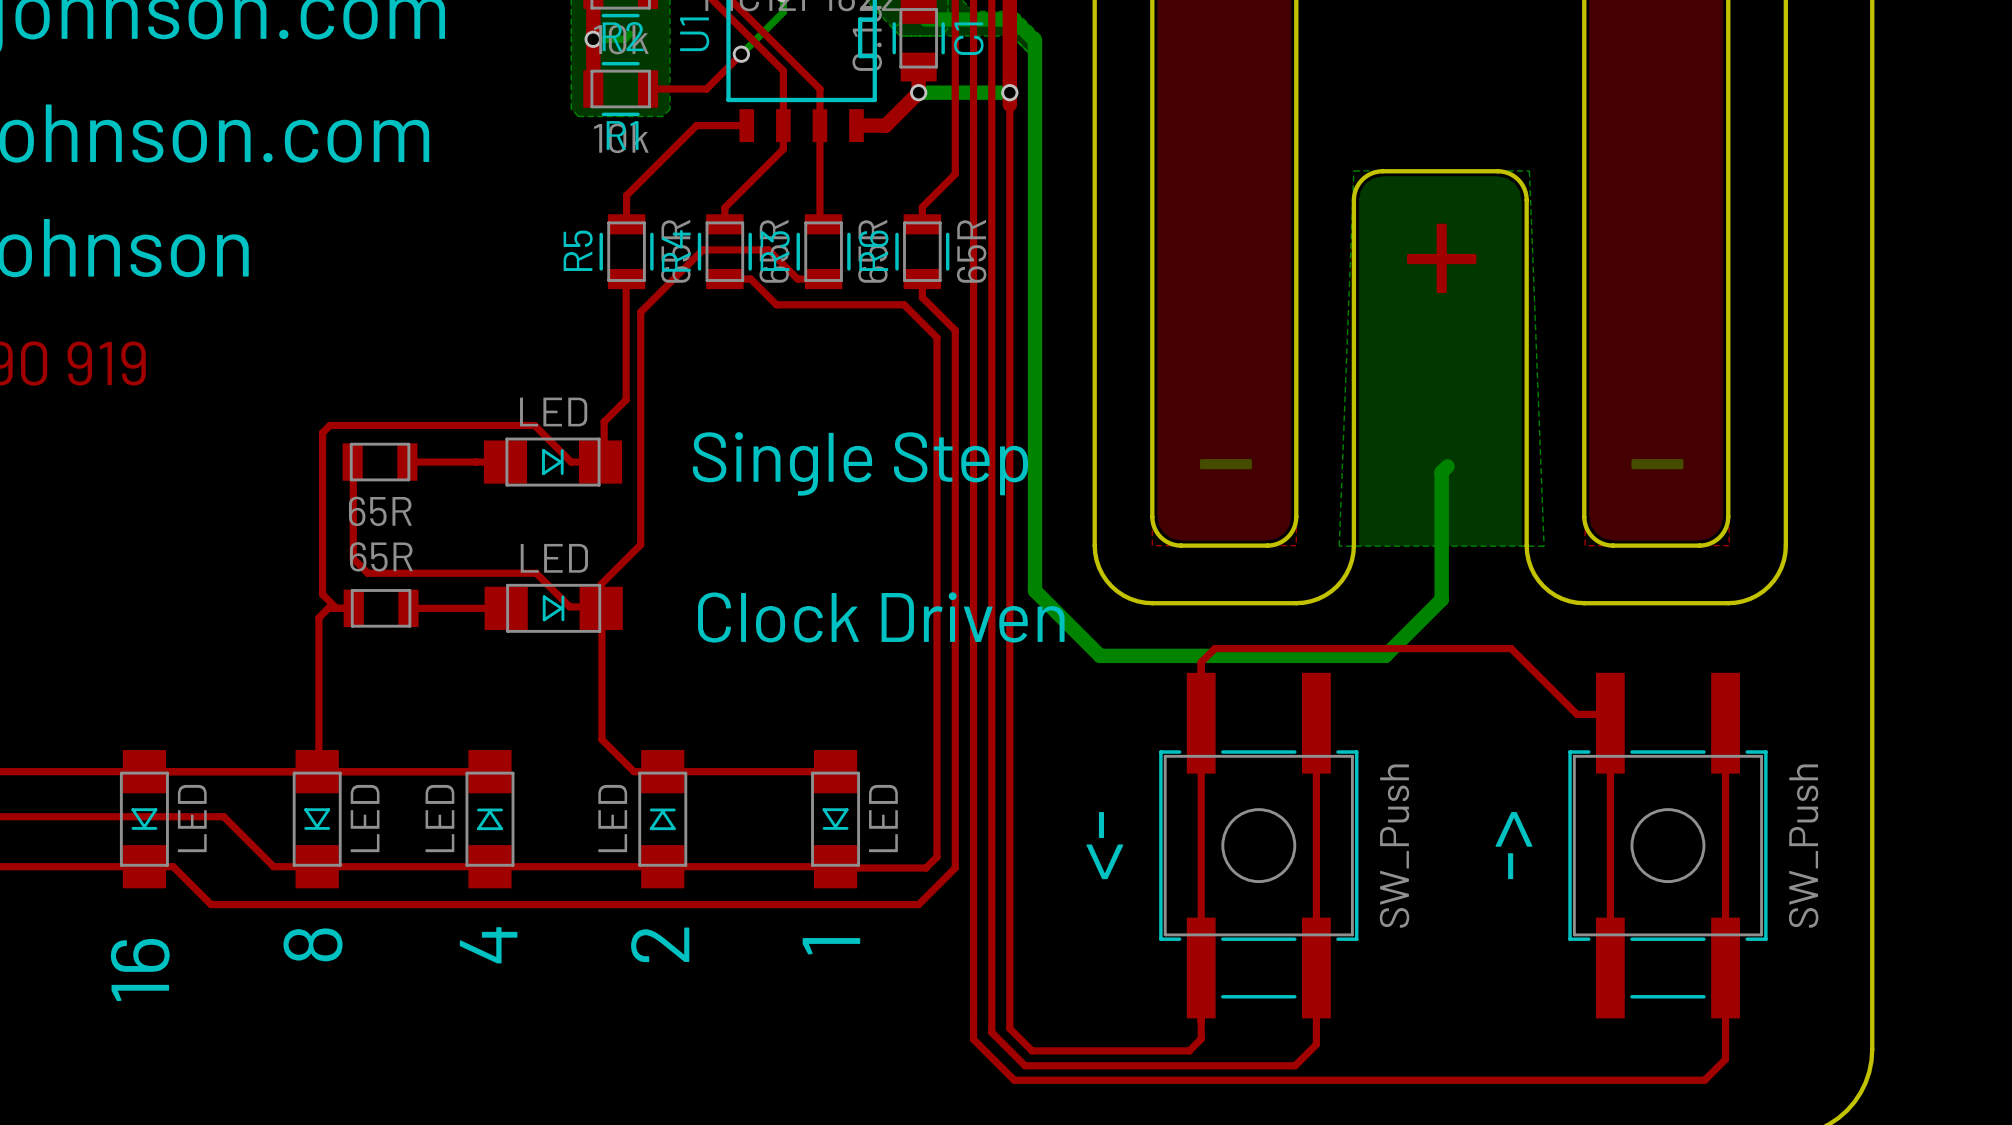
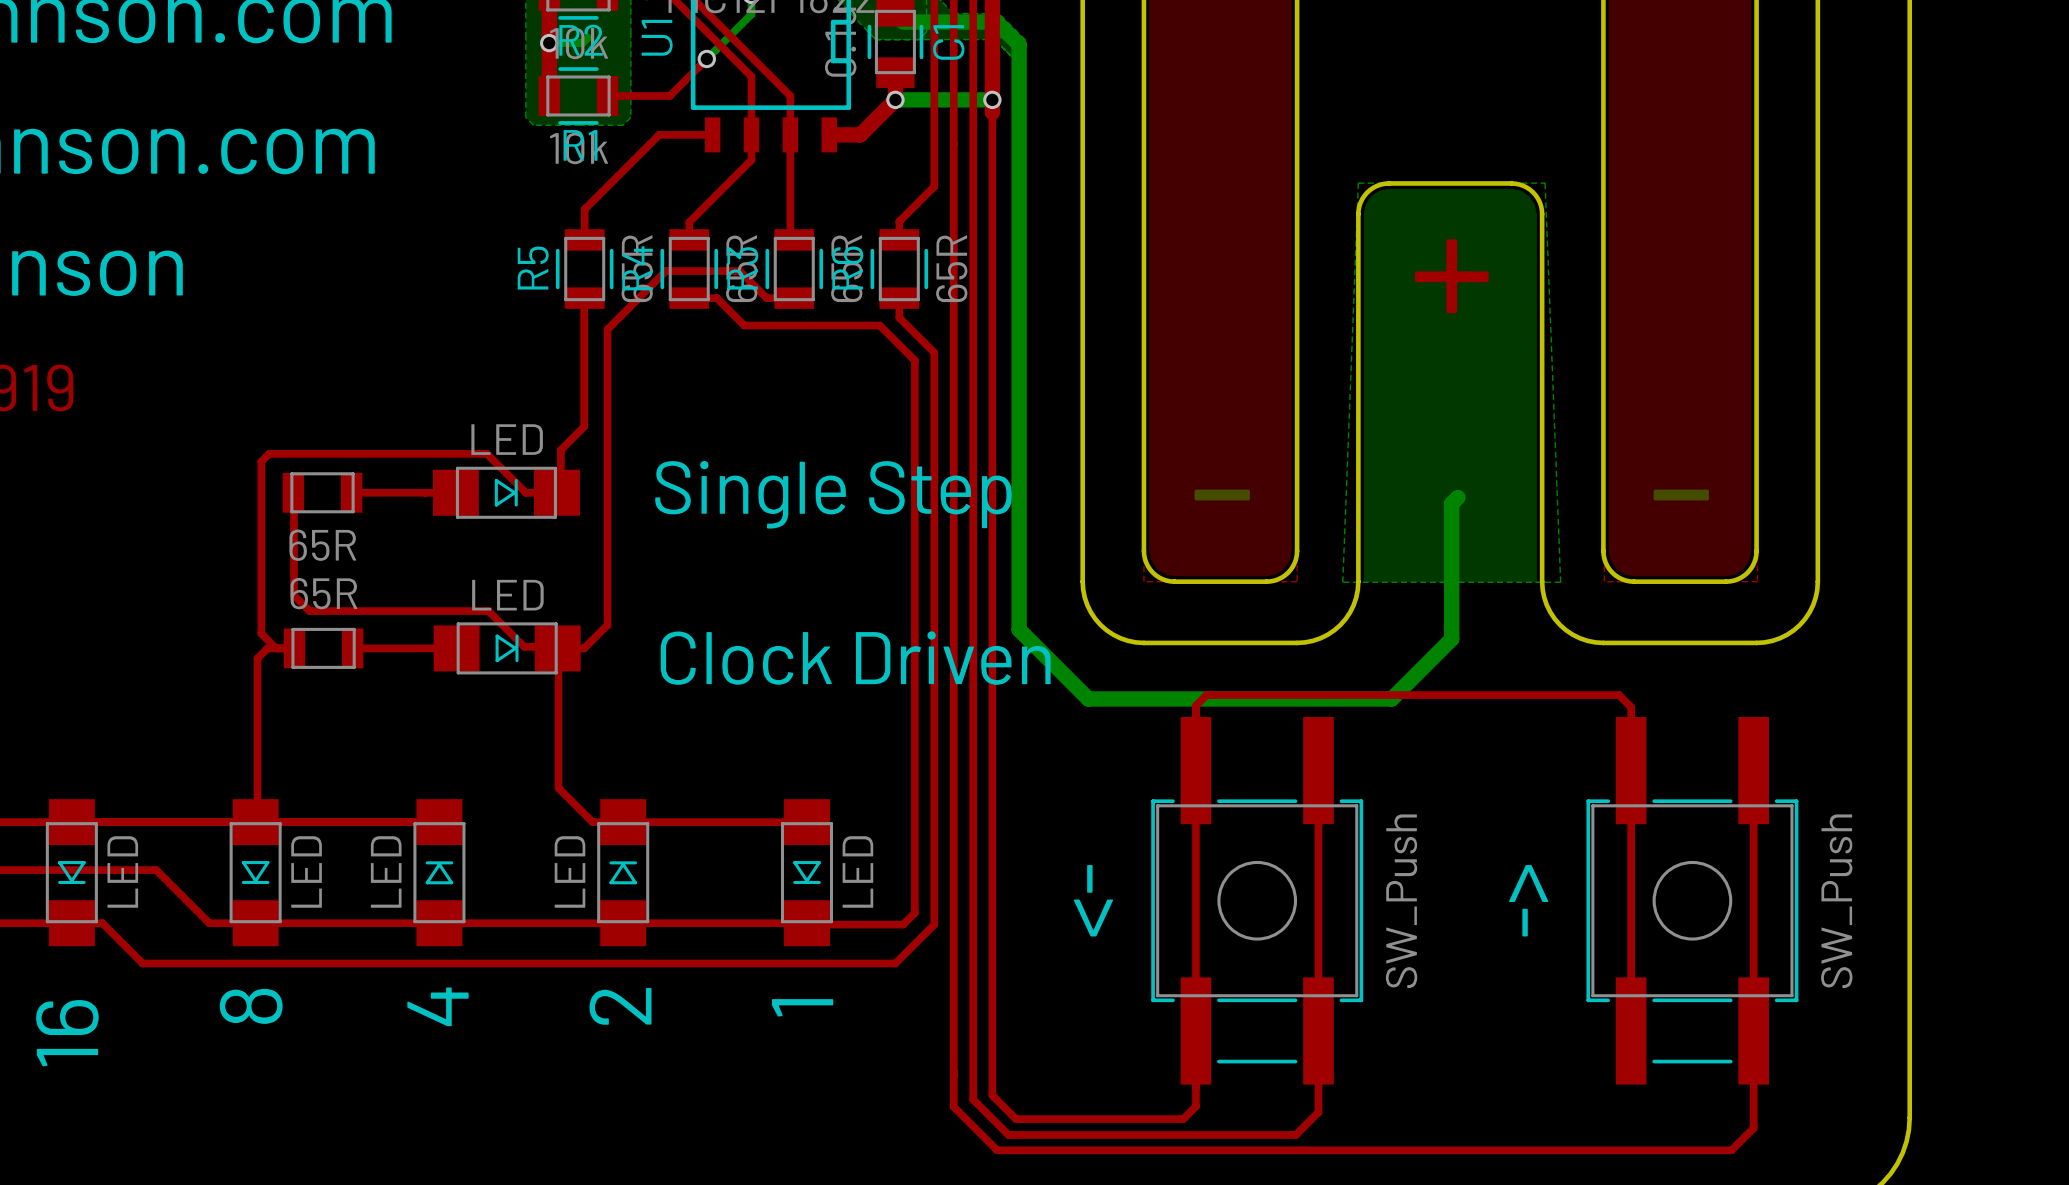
top track: (772, 253) (768, 249) (702, 249) (640, 312) (640, 544) (601, 584) (601, 608) -> (739, 271) (665, 271) (607, 329) (607, 625) (584, 648) (557, 648)
top track: (1211, 652) (1214, 648) (1511, 648) (1576, 714) (1602, 714) (1610, 722) -> (1206, 695) (1619, 695) (1631, 707) (1631, 769)

